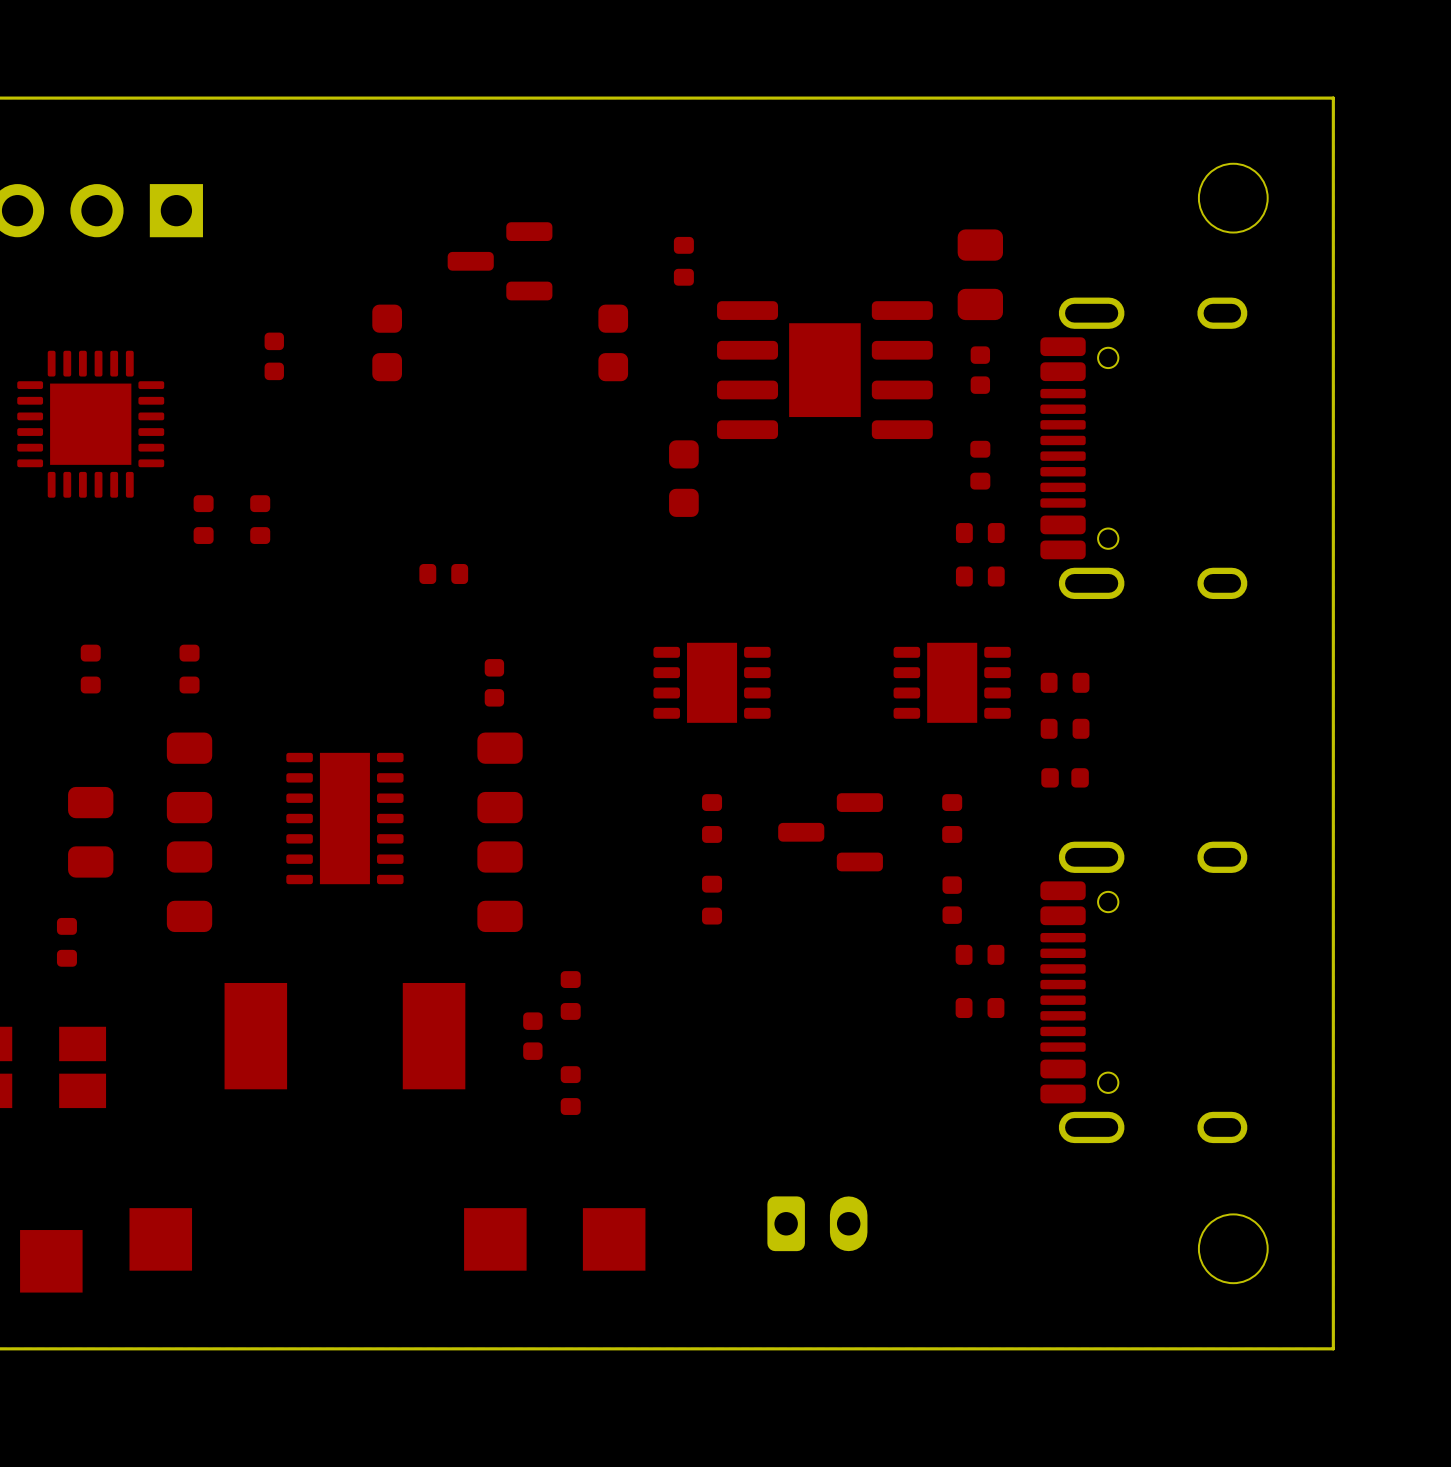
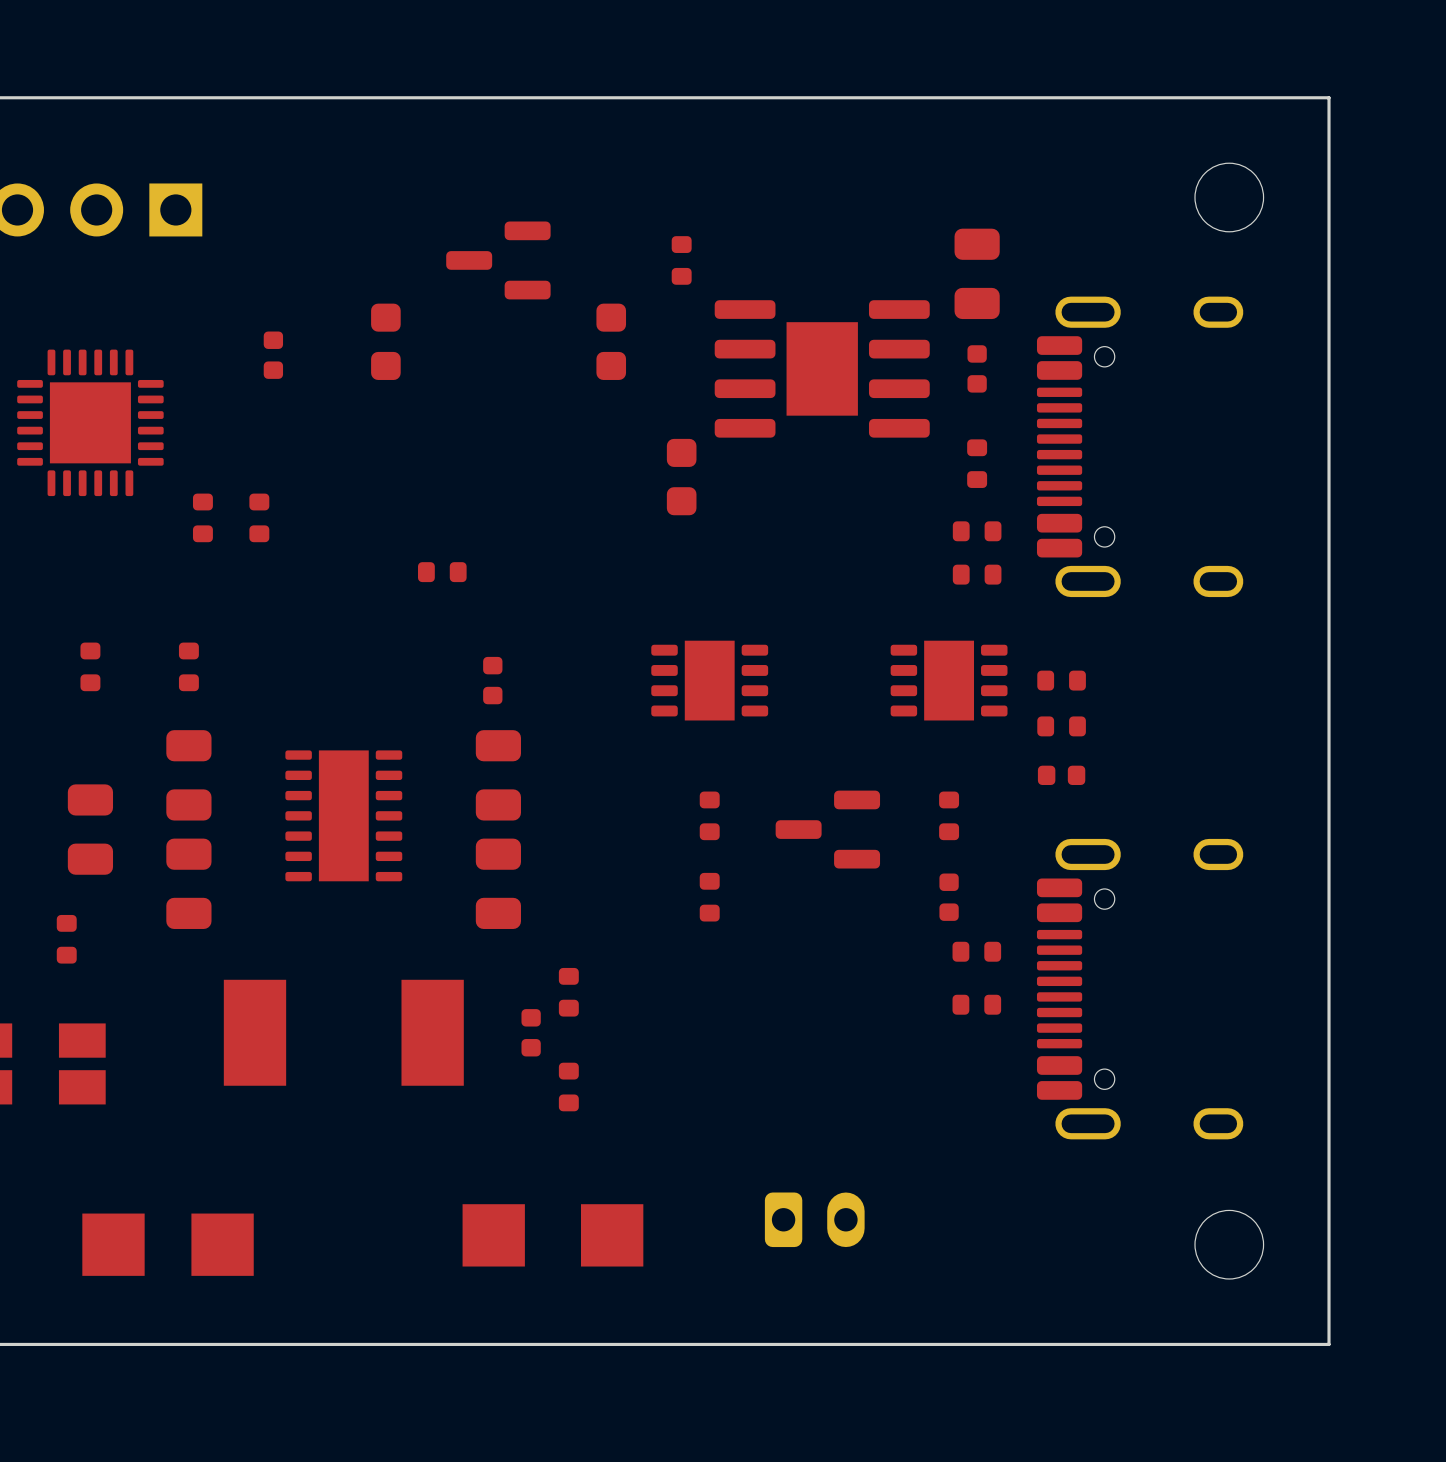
part: (160, 1239) -> none
part: none -> (113, 1244)
part: none -> (222, 1244)
part: (51, 1261) -> none

